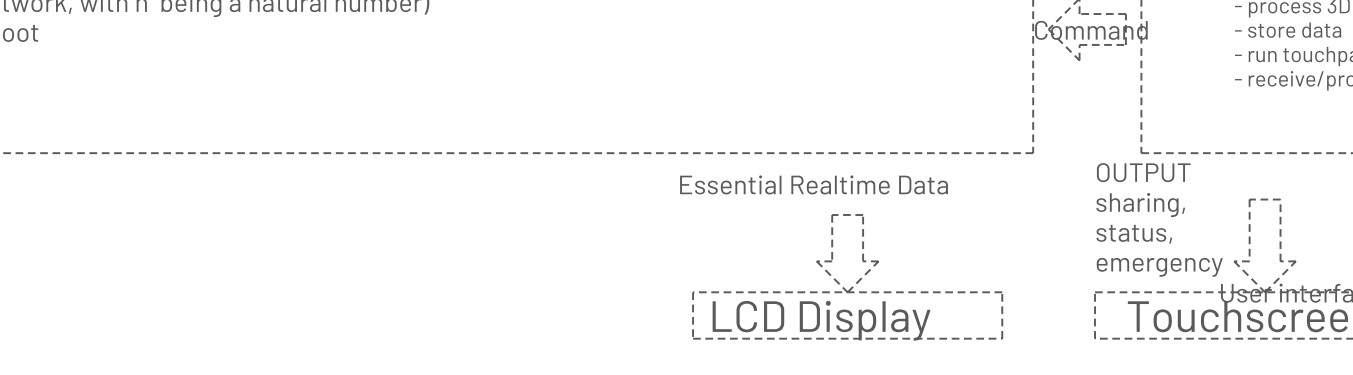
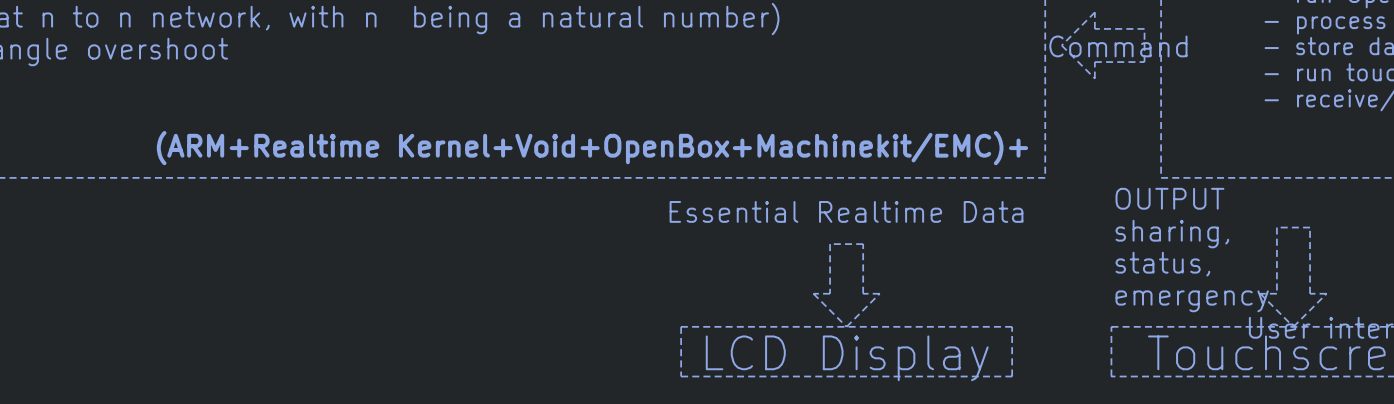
text: none -> (ARM+Realtime Kernel+Void+OpenBox+Machinekit/EMC)+ (592, 148)

